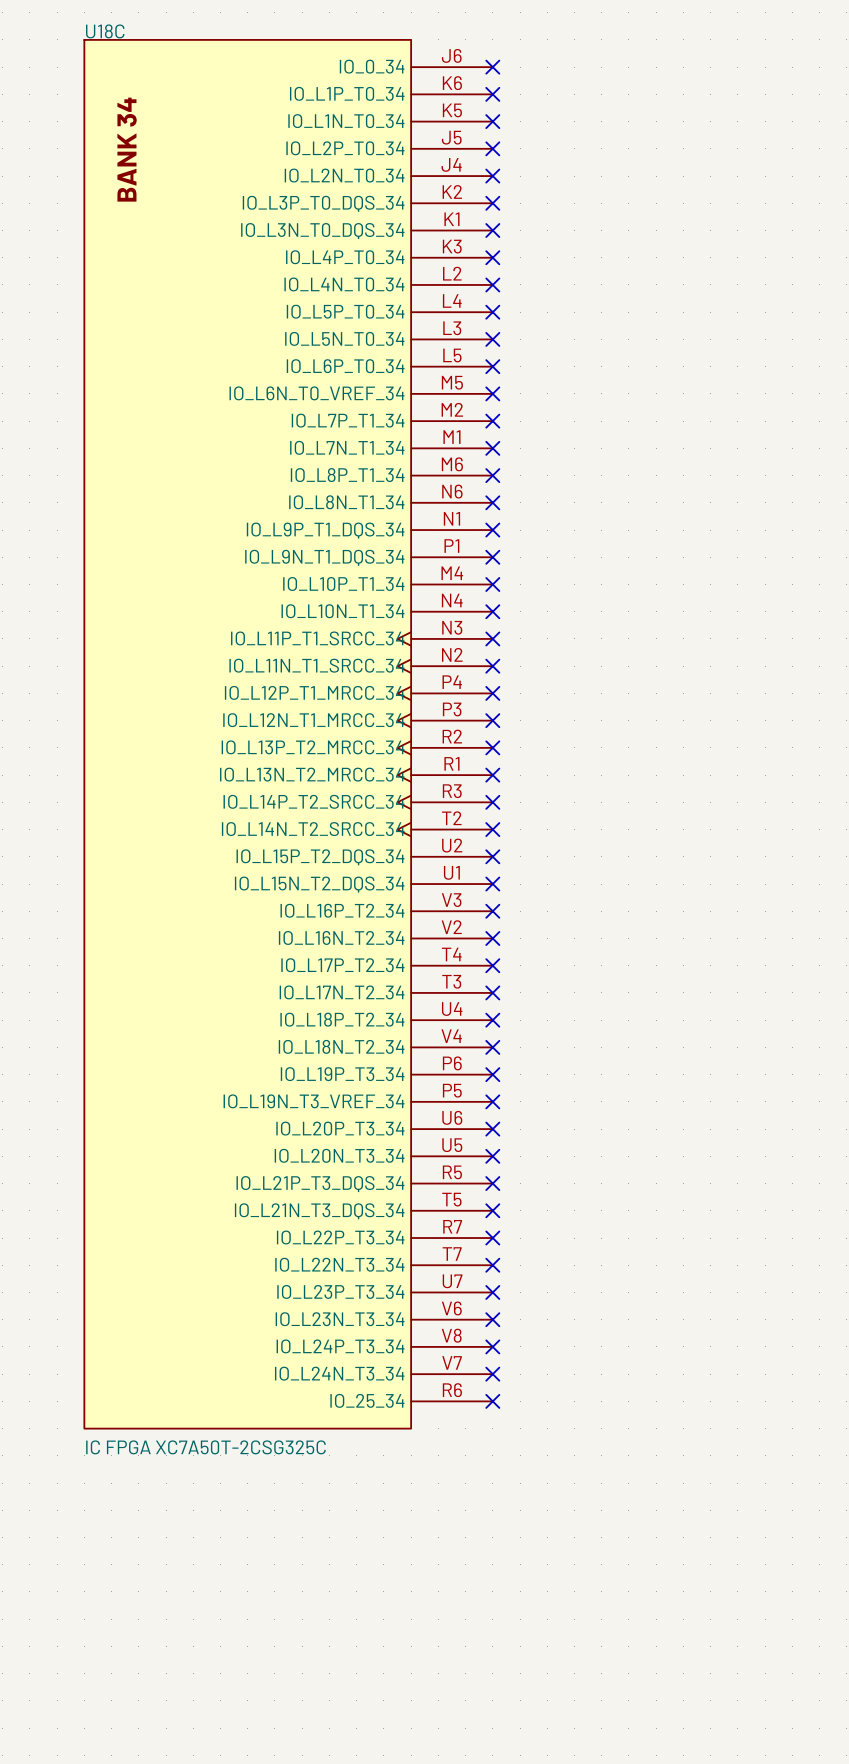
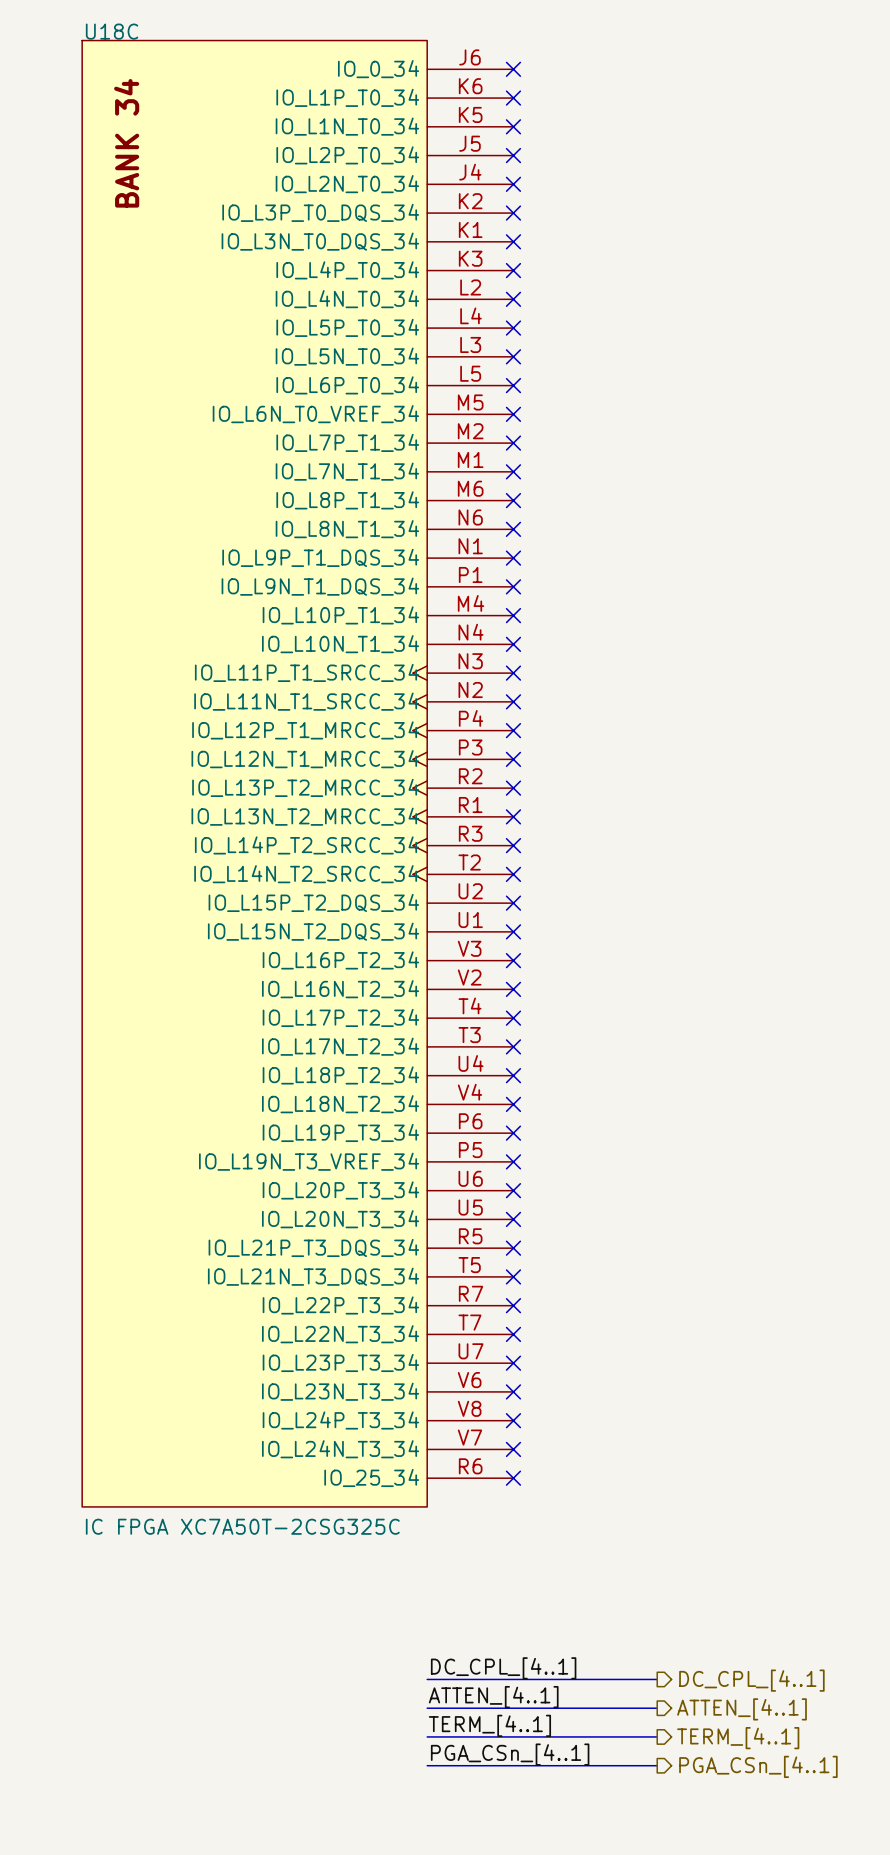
label: none -> DC_CPL_[4..1] (503, 1668)
bus: none -> (427, 1679) (657, 1679)
hierarchical label: none -> DC_CPL_[4..1] (751, 1680)
label: none -> ATTEN_[4..1] (493, 1697)
bus: none -> (427, 1708) (657, 1708)
hierarchical label: none -> ATTEN_[4..1] (741, 1709)
label: none -> TERM_[4..1] (489, 1725)
bus: none -> (427, 1736) (657, 1736)
hierarchical label: none -> TERM_[4..1] (738, 1738)
label: none -> PGA_CSn_[4..1] (510, 1754)
bus: none -> (427, 1765) (657, 1765)
hierarchical label: none -> PGA_CSn_[4..1] (758, 1766)

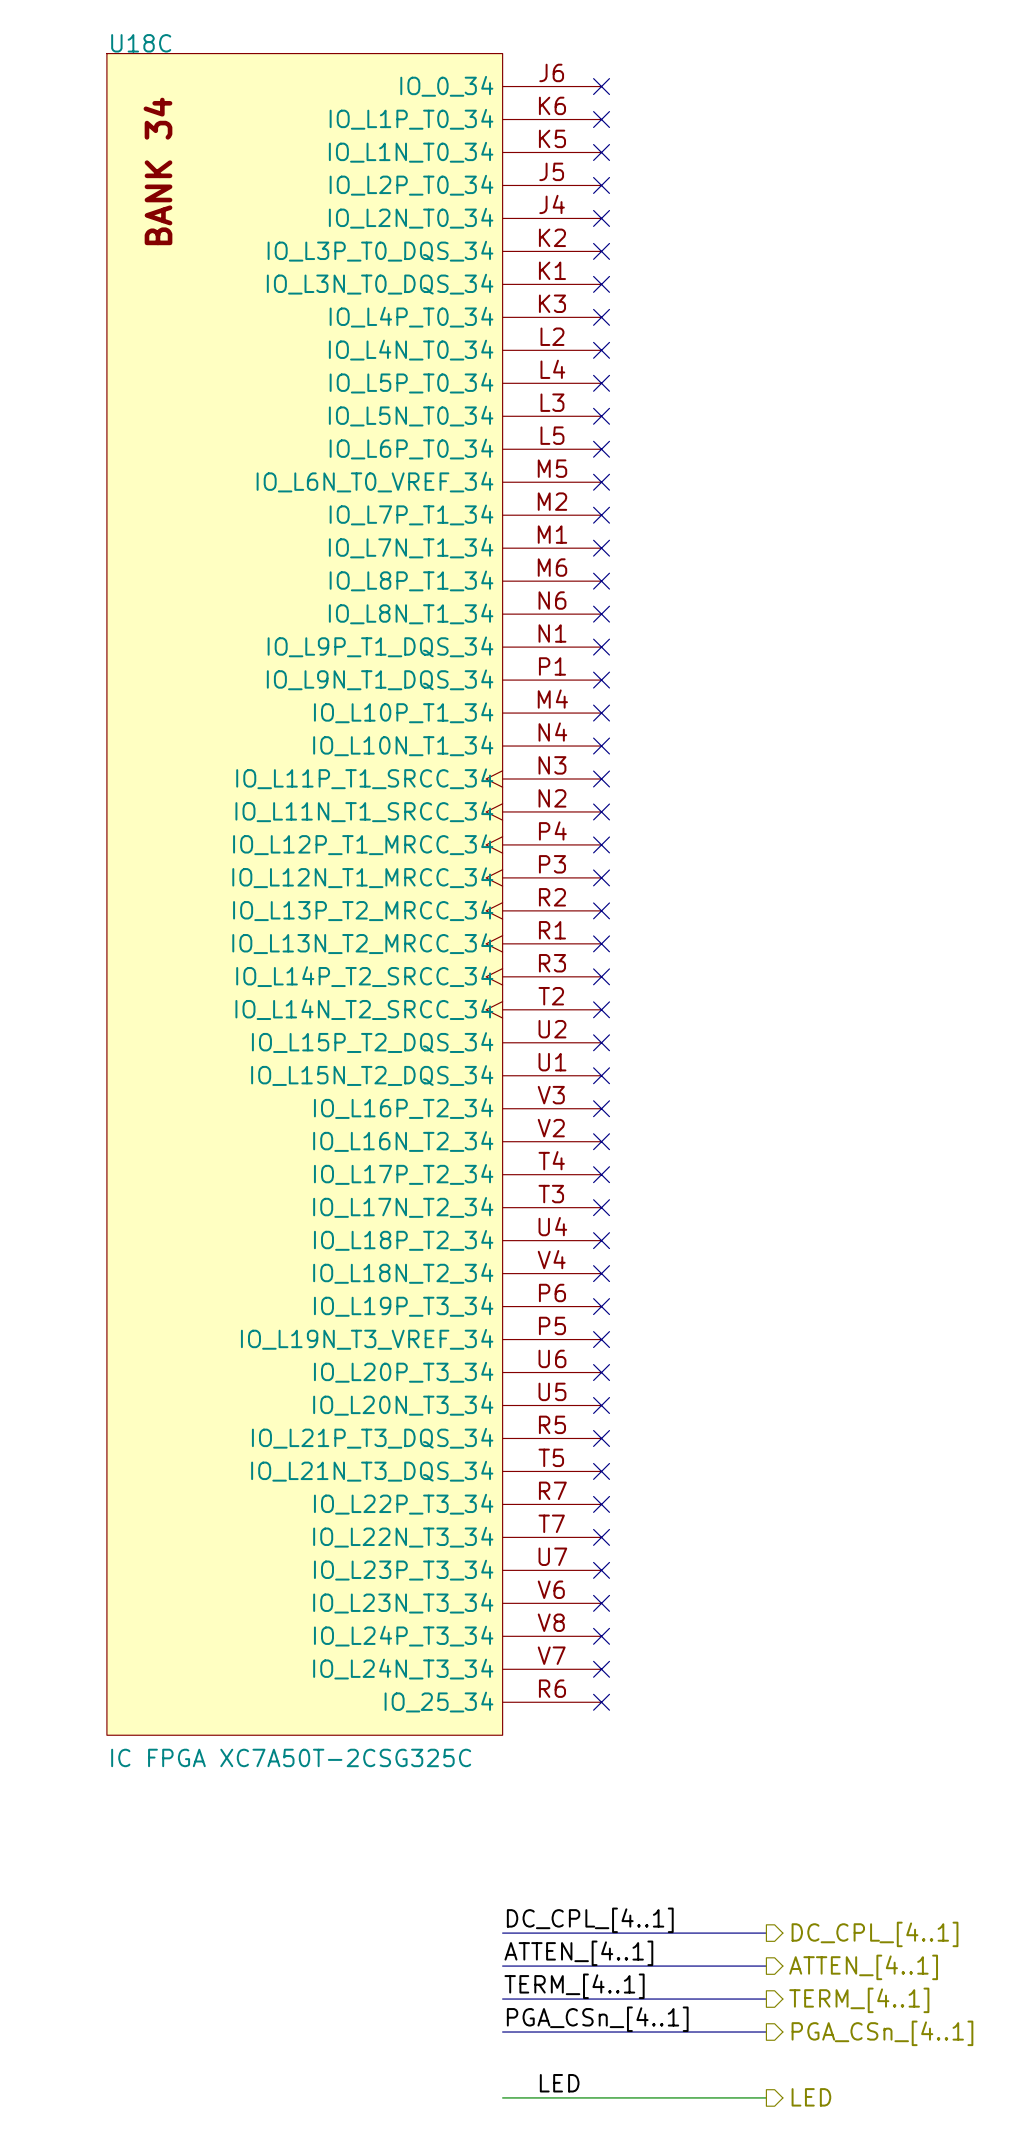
label: none -> LED (559, 2083)
hierarchical label: none -> LED (811, 2097)
wire: none -> (502, 2097) (766, 2097)

